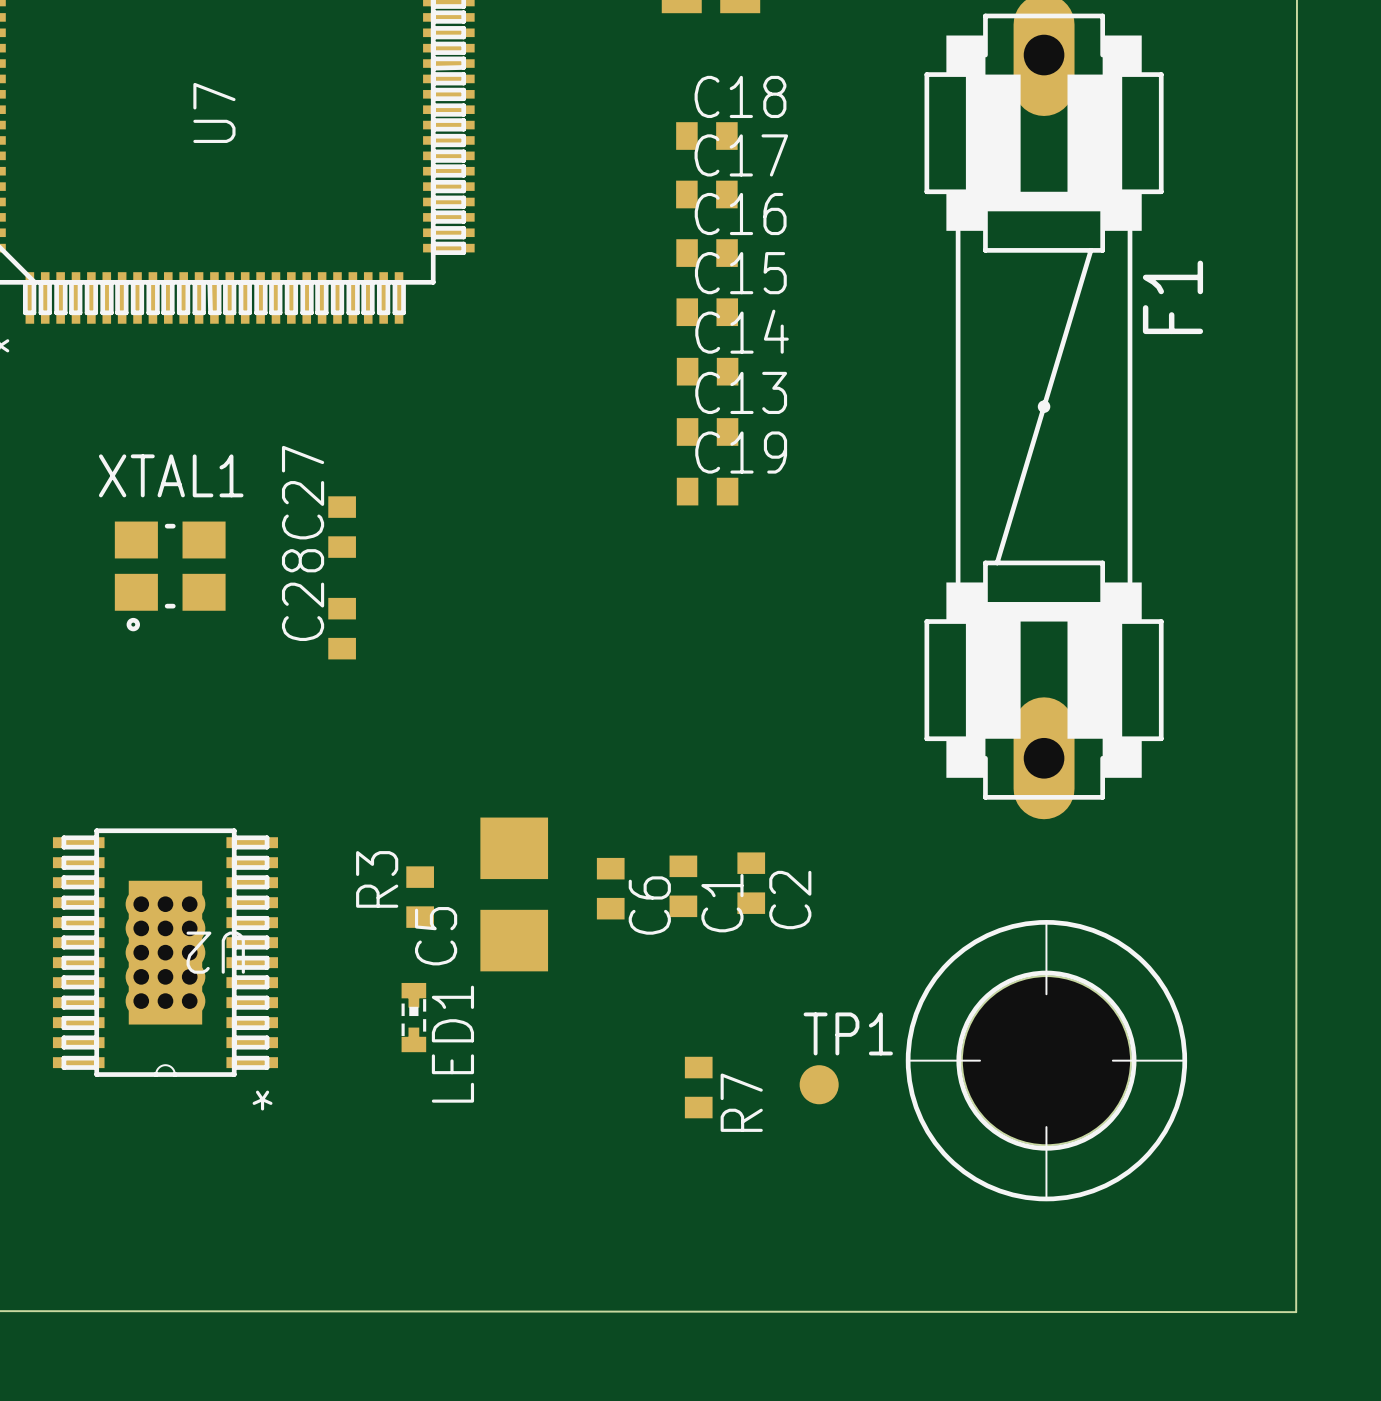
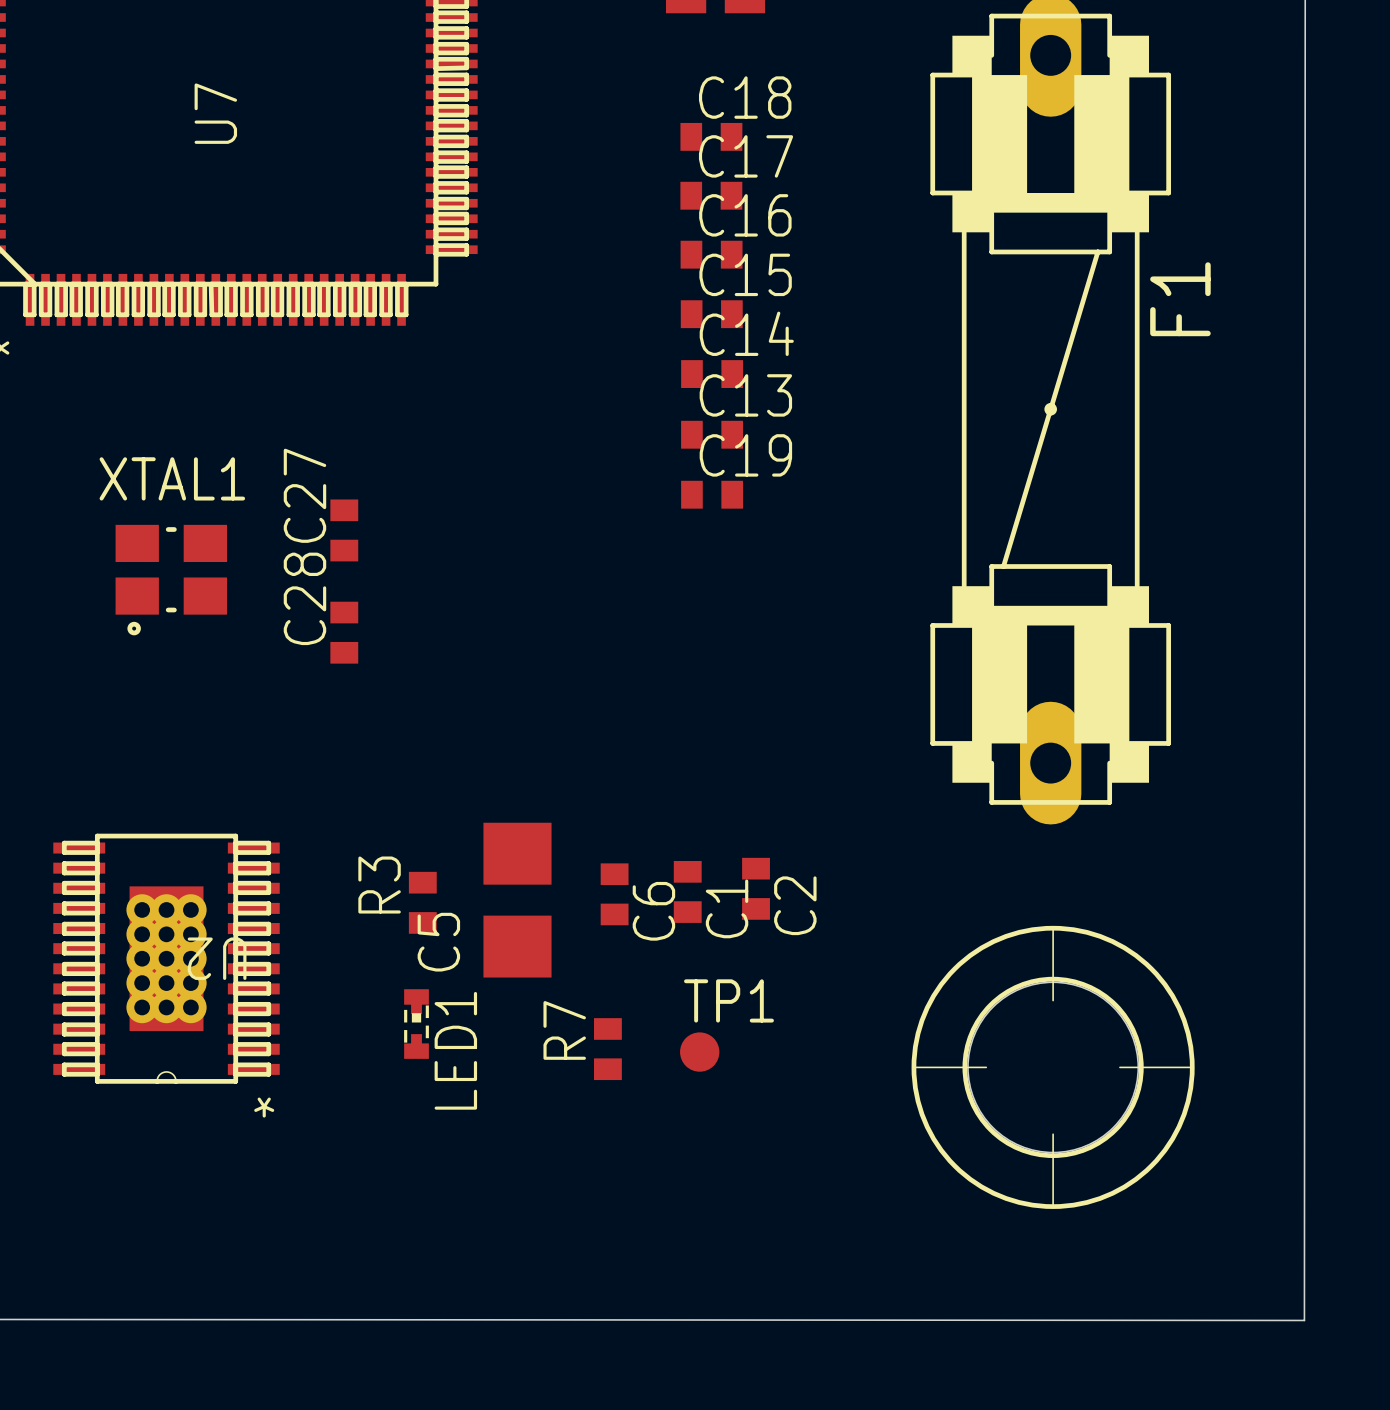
TP1 position: (819, 1084) -> (699, 1052)
R7 position: (698, 1087) -> (607, 1049)
R7 name position: R7 (741, 1102) -> R7 (564, 1030)

